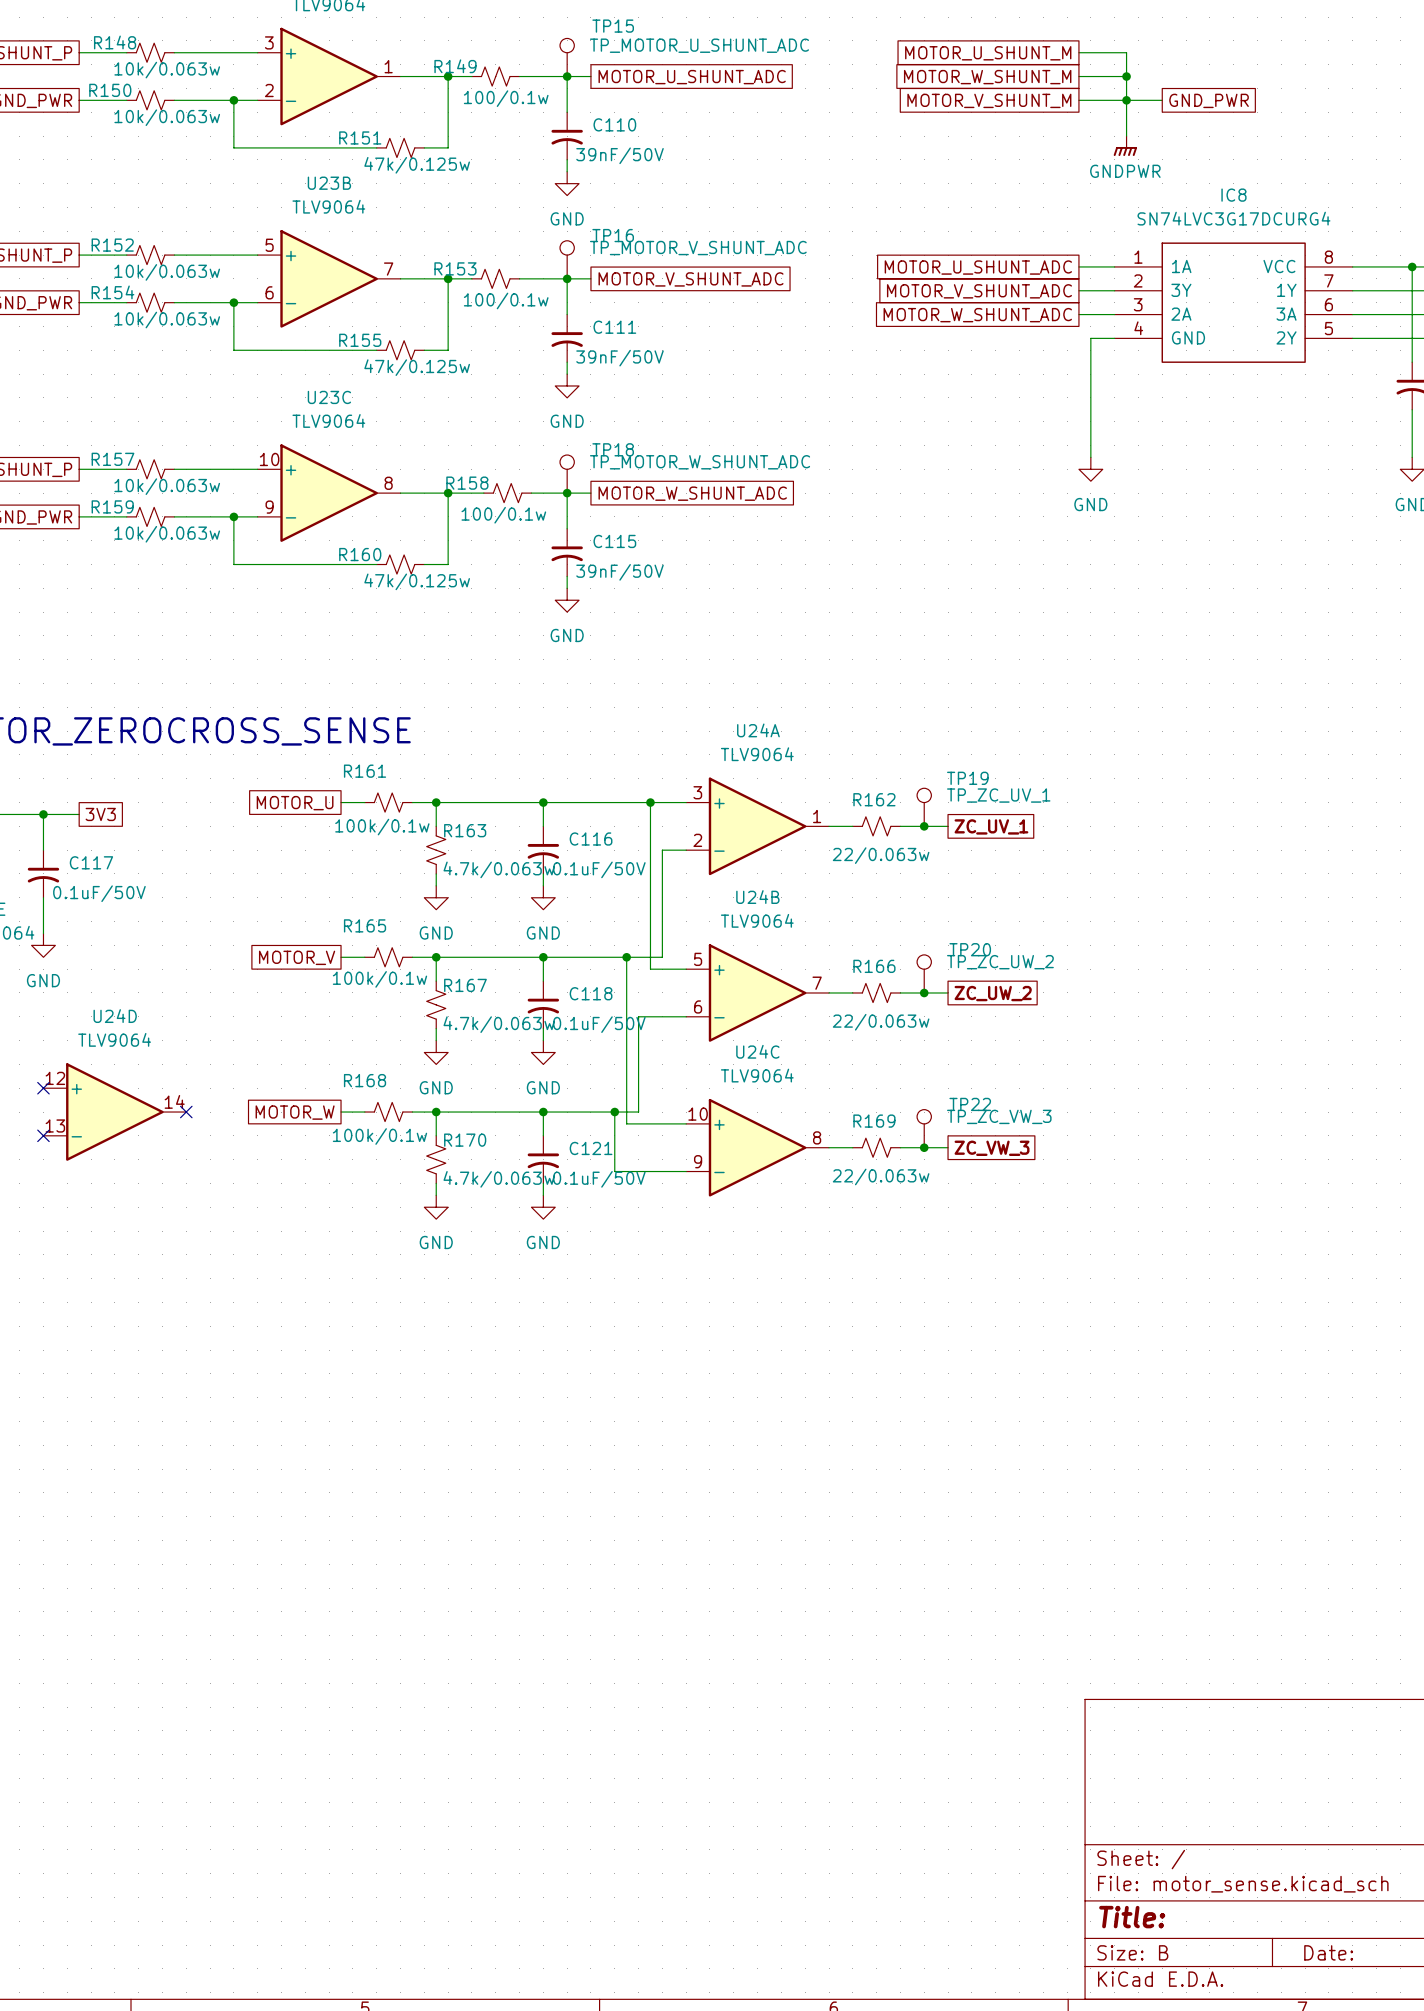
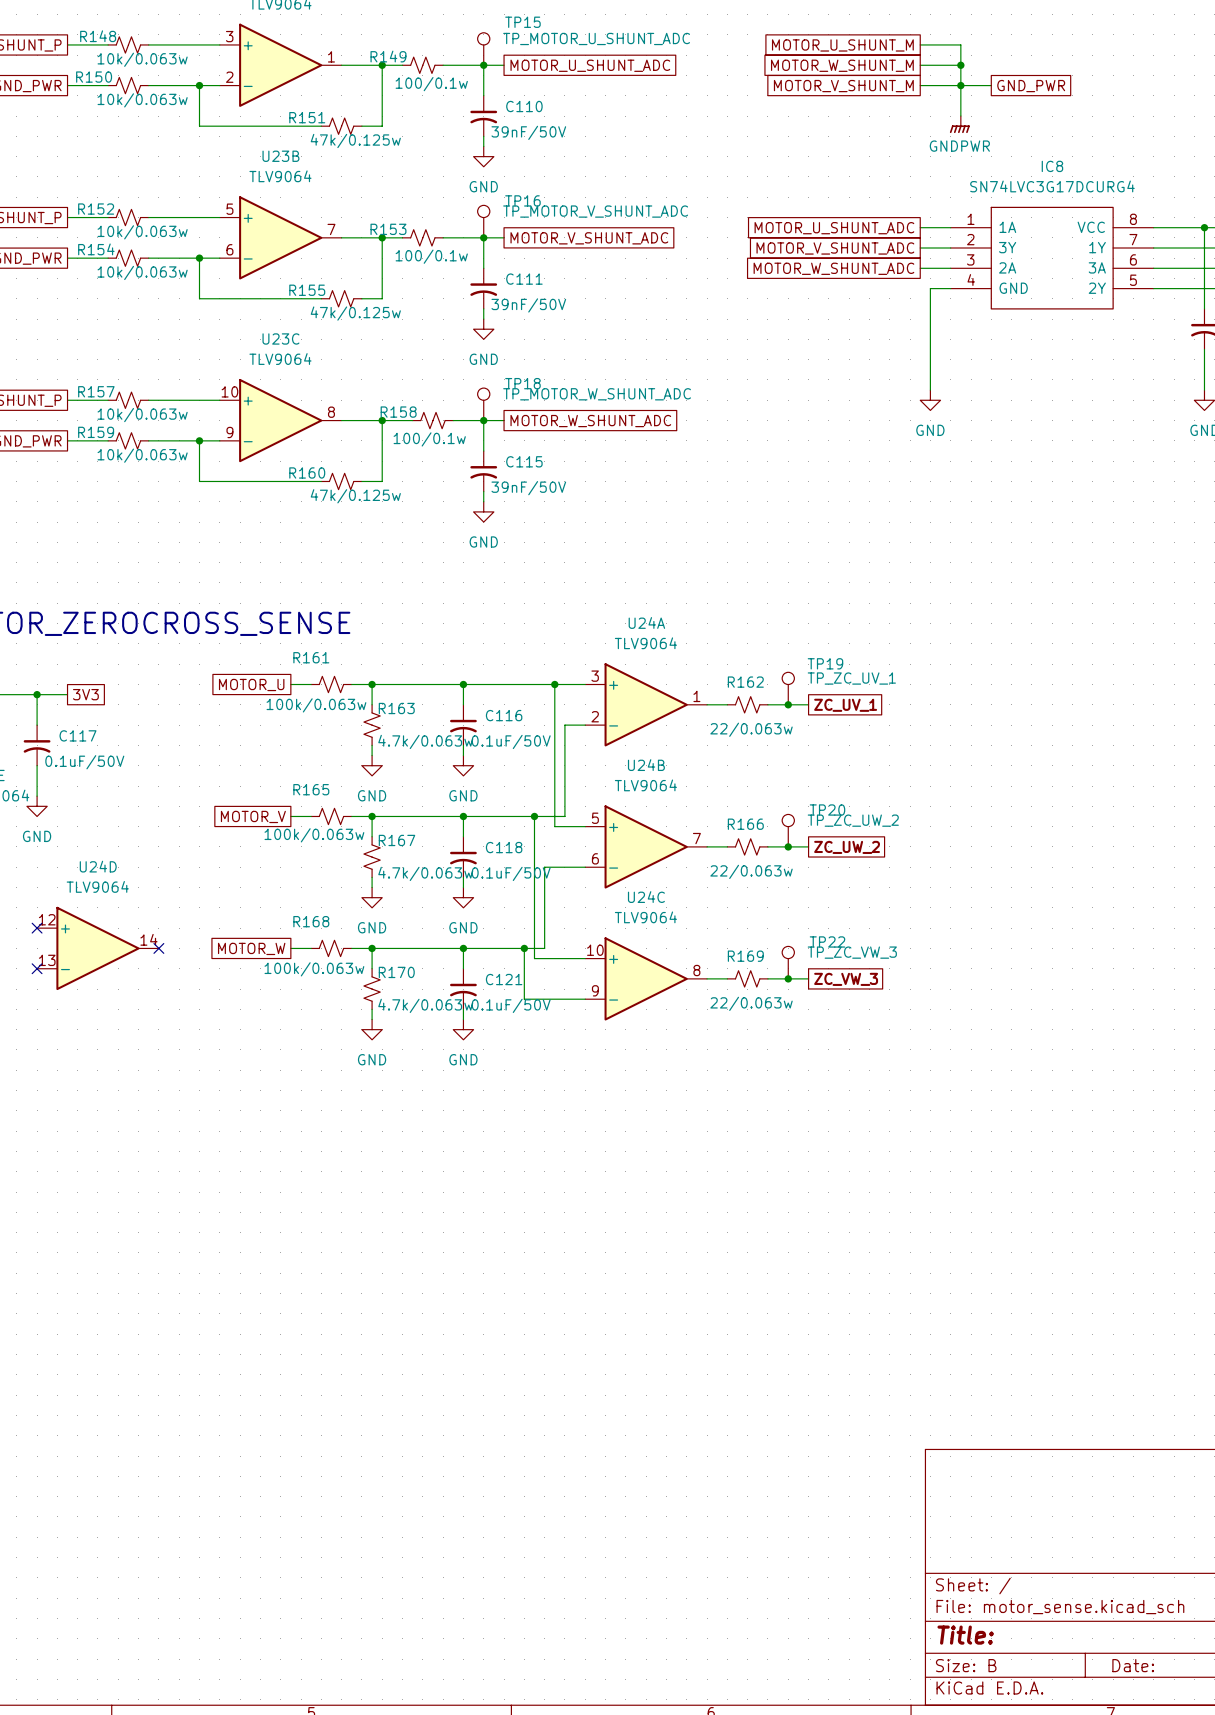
R161 value: 100k/0.1w (382, 827) -> 100k/0.063w (316, 705)
R165 value: 100k/0.1w (379, 979) -> 100k/0.063w (314, 835)
R168 value: 100k/0.1w (379, 1136) -> 100k/0.063w (314, 969)

